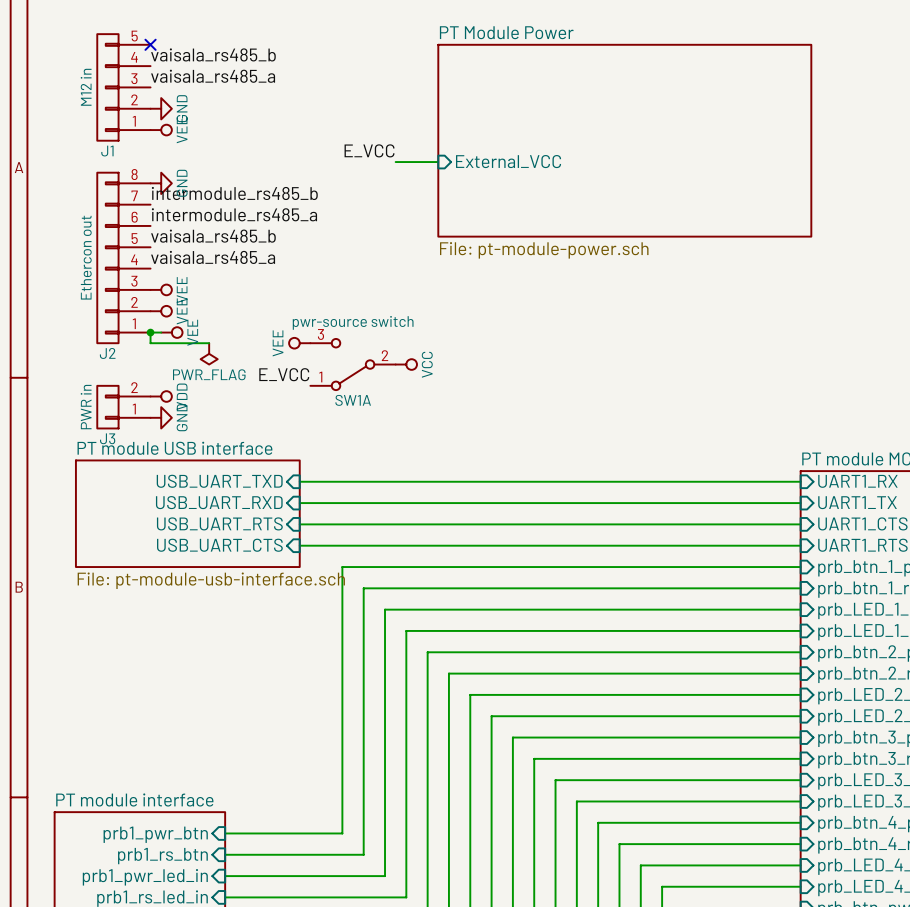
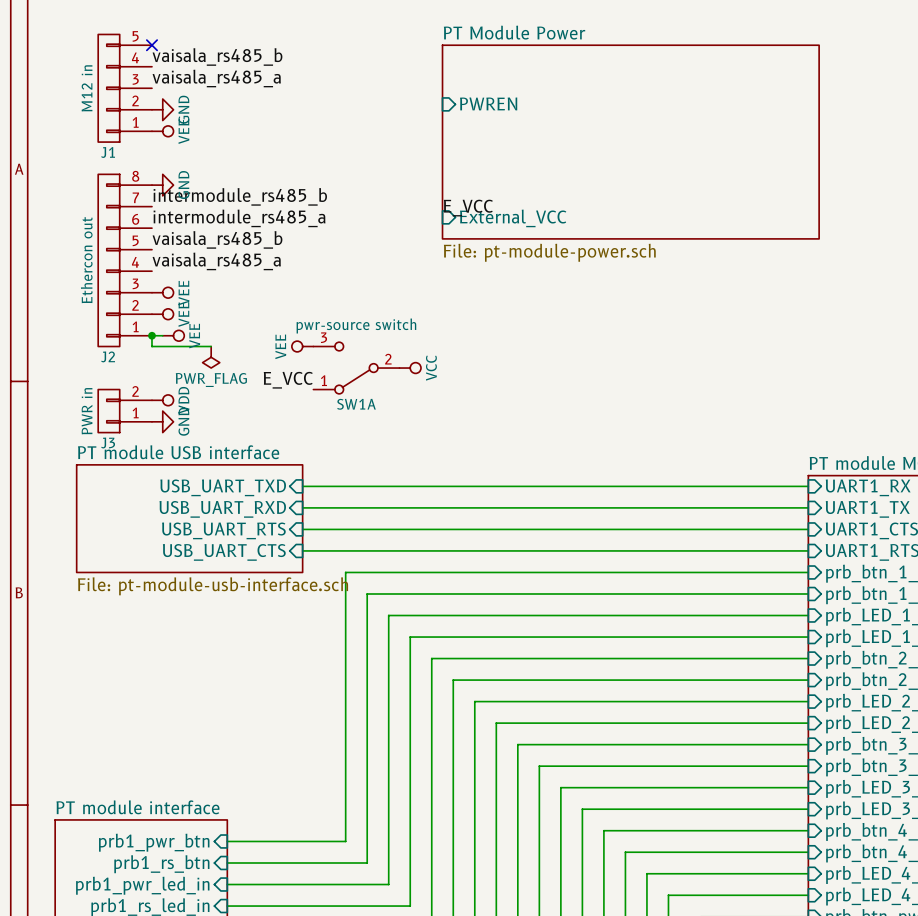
sheet pin: none -> PWREN (488, 103)
label position: E_VCC (369, 150) -> E_VCC (468, 208)
sheet pin position: External_VCC (508, 161) -> External_VCC (513, 218)
wire: (395, 162) (438, 162) -> none

